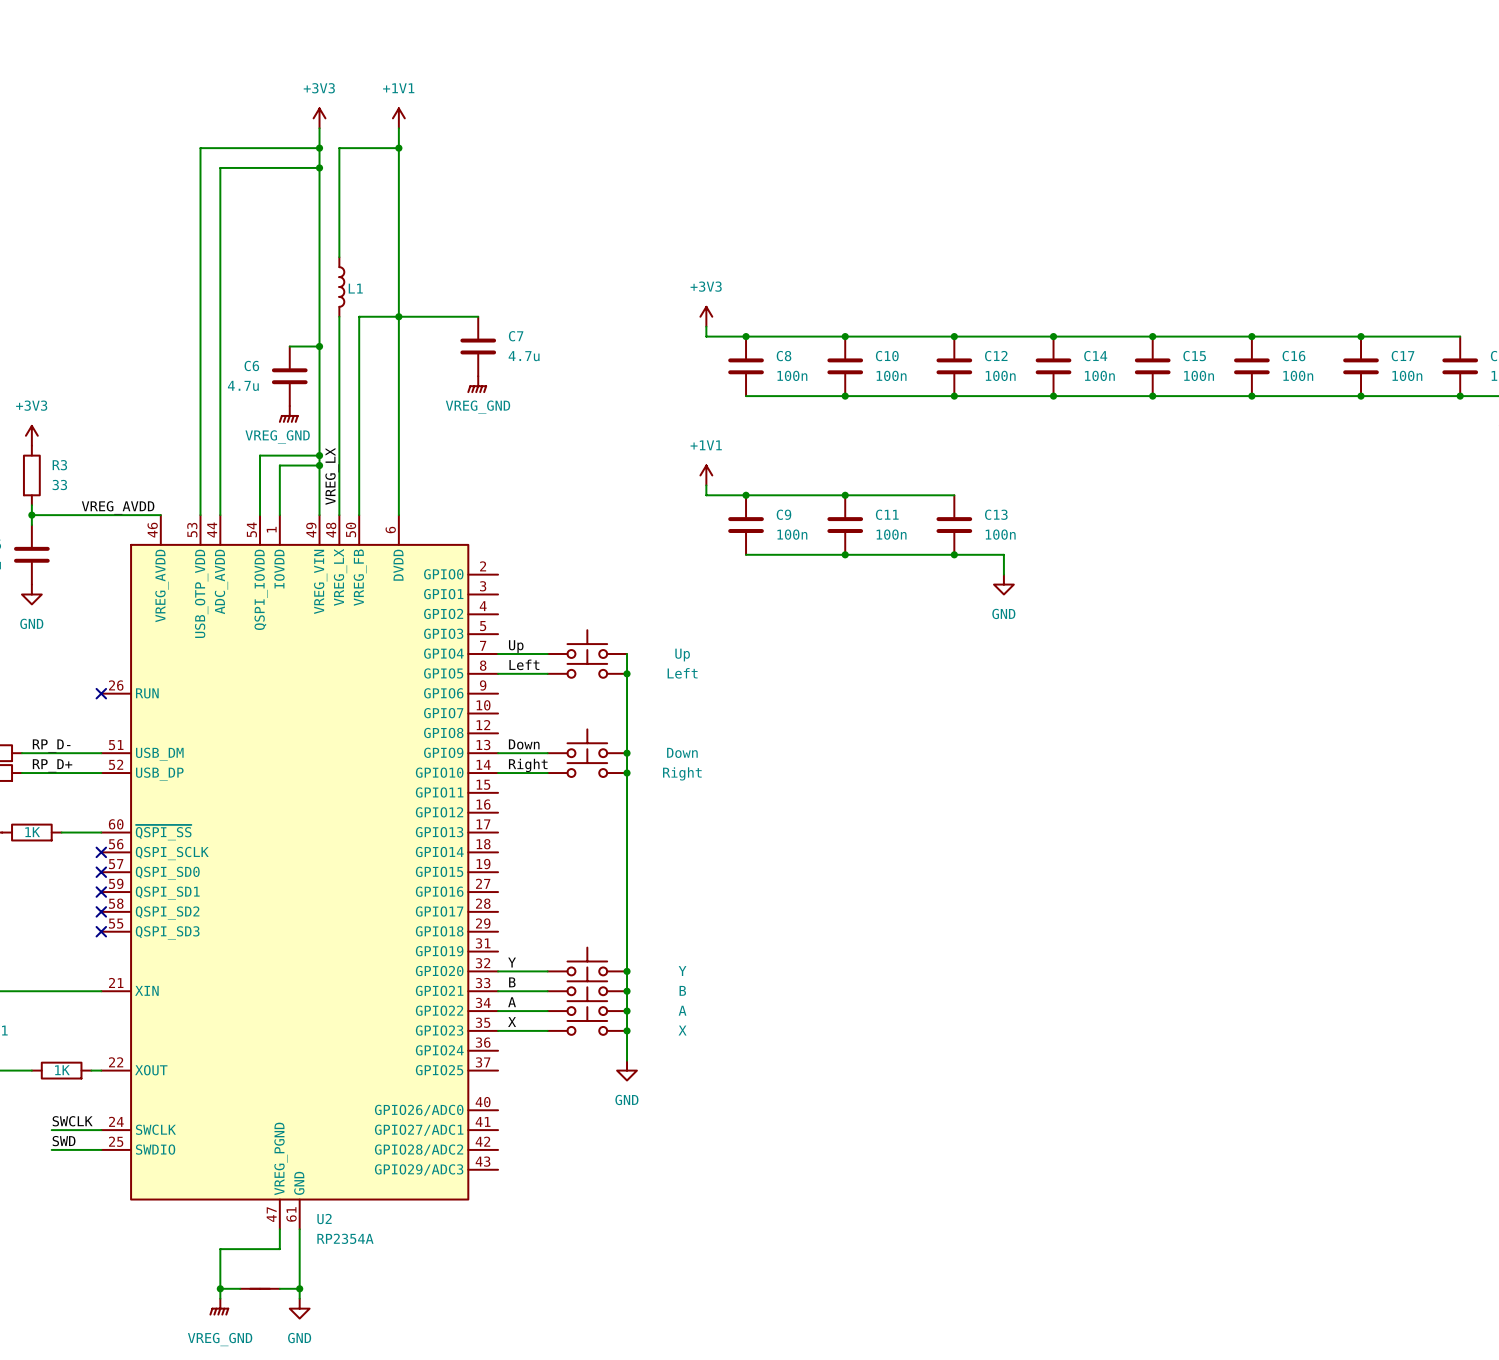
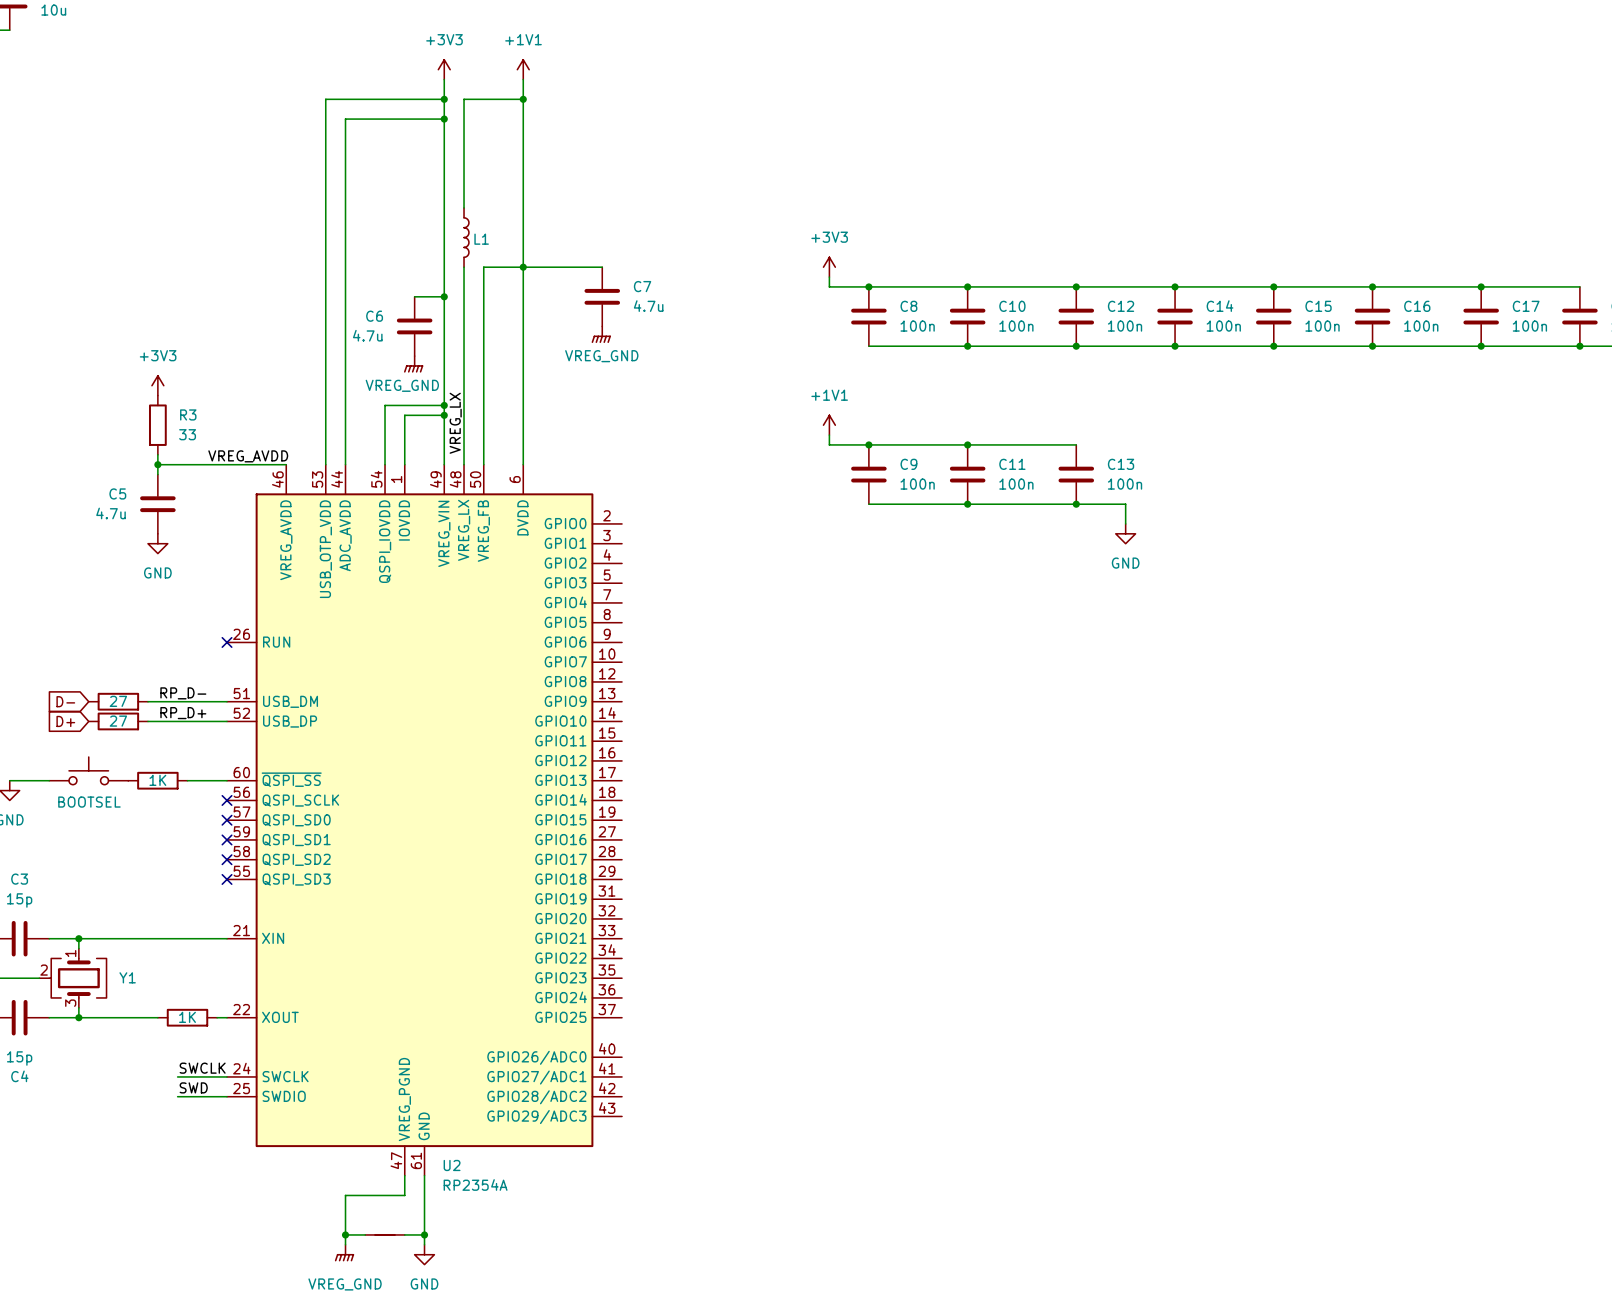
part: Up (587, 644) -> none
label: Up (516, 646) -> none
wire: (498, 653) (547, 653) -> none
wire: (627, 653) (627, 1060) -> none
part: Left (587, 663) -> none
label: Left (524, 664) -> none
wire: (498, 673) (547, 673) -> none
junction: (627, 673) -> none
part: Down (587, 743) -> none
label: Down (524, 744) -> none
wire: (498, 753) (547, 753) -> none
junction: (627, 753) -> none
part: Right (587, 763) -> none
label: Right (528, 765) -> none
wire: (498, 773) (547, 773) -> none
junction: (627, 773) -> none
part: Y (587, 961) -> none
label: Y (512, 962) -> none
wire: (498, 971) (547, 971) -> none
junction: (627, 971) -> none
part: B (587, 981) -> none
label: B (512, 982) -> none
wire: (498, 991) (547, 991) -> none
junction: (627, 991) -> none
part: A (587, 1001) -> none
label: A (512, 1002) -> none
wire: (498, 1011) (547, 1011) -> none
junction: (627, 1011) -> none
part: X (587, 1020) -> none
label: X (512, 1022) -> none
wire: (498, 1030) (547, 1030) -> none
junction: (627, 1030) -> none
power symbol: GND (627, 1070) -> none

